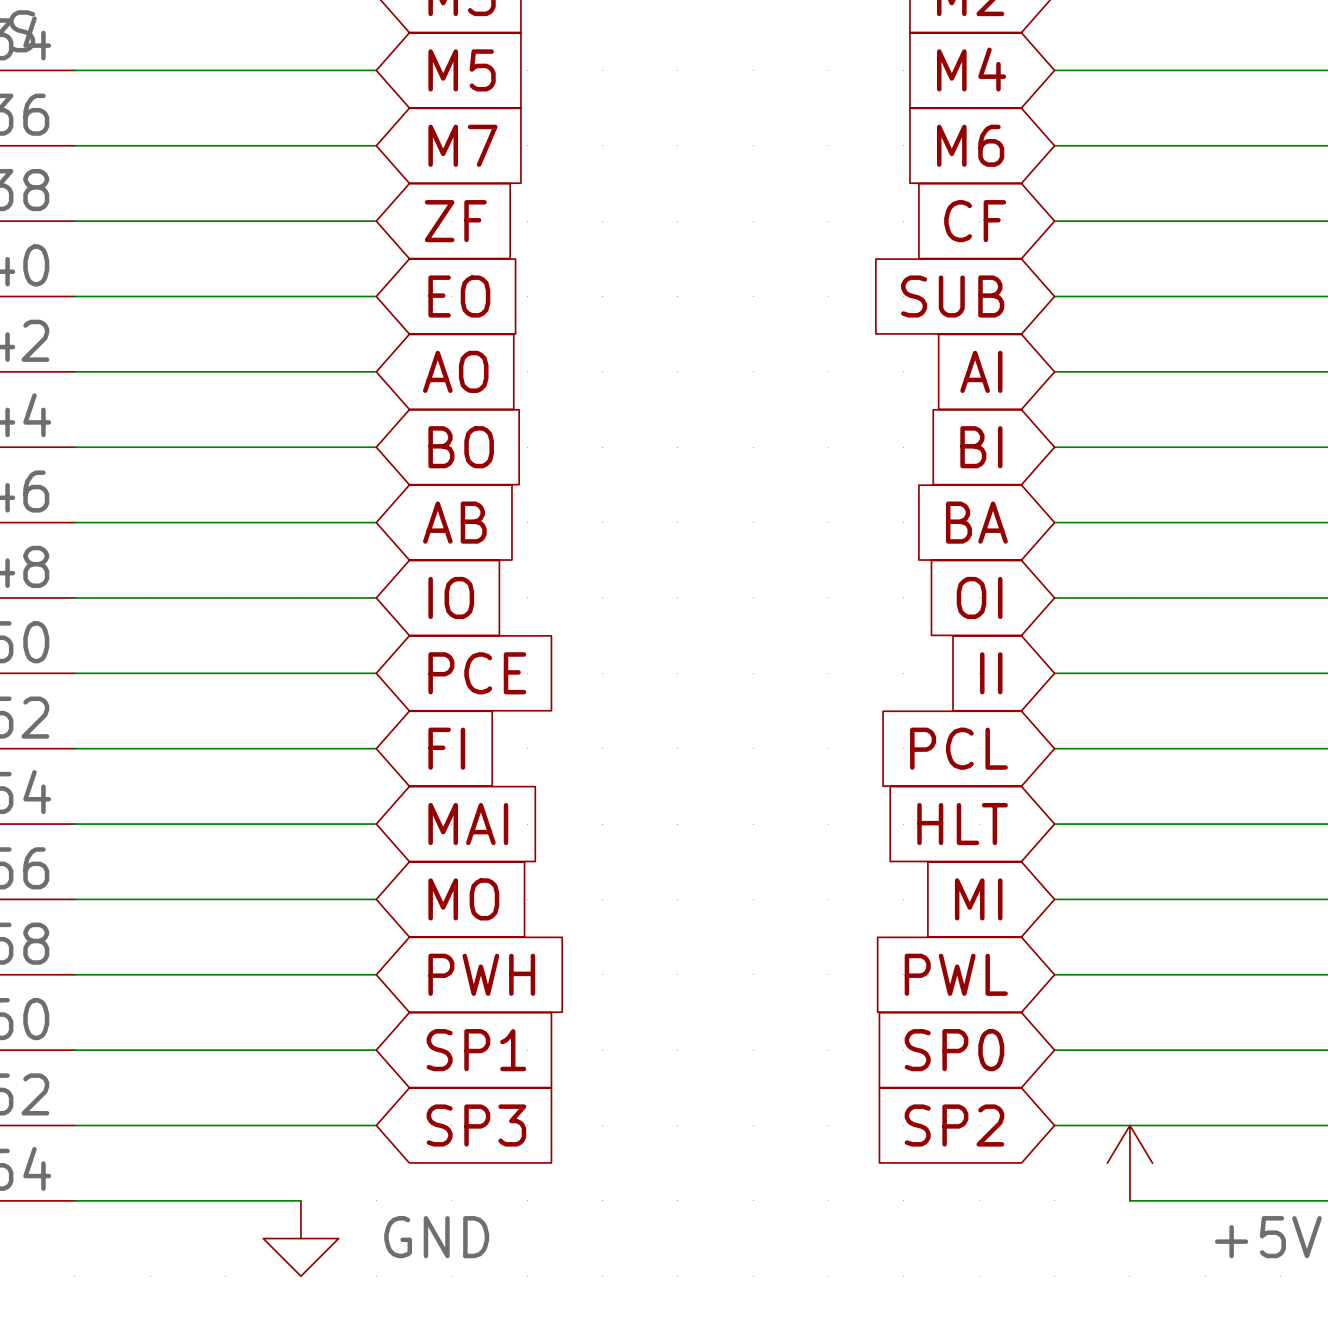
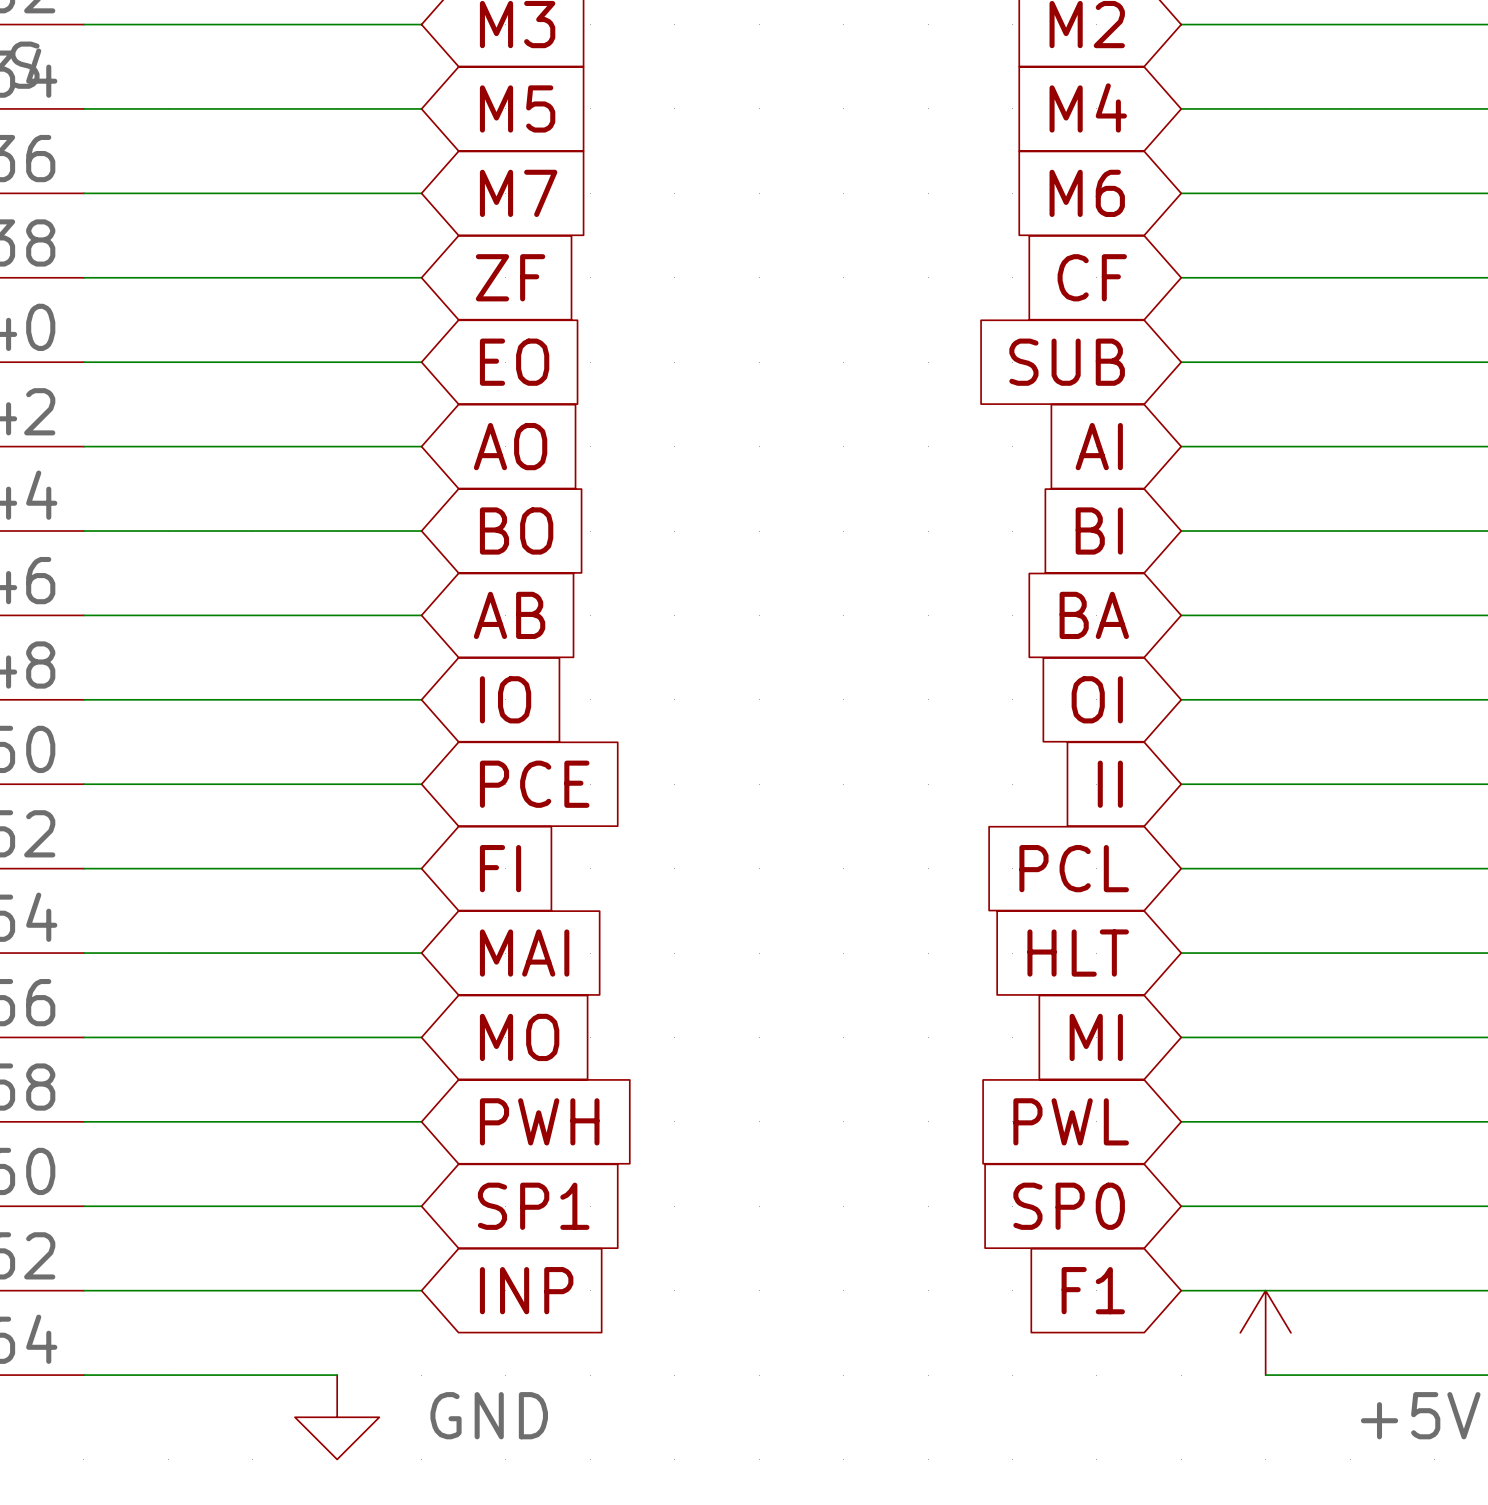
global label: SP3 (476, 1125) -> INP (526, 1290)
global label: SP2 (954, 1125) -> F1 (1093, 1290)

